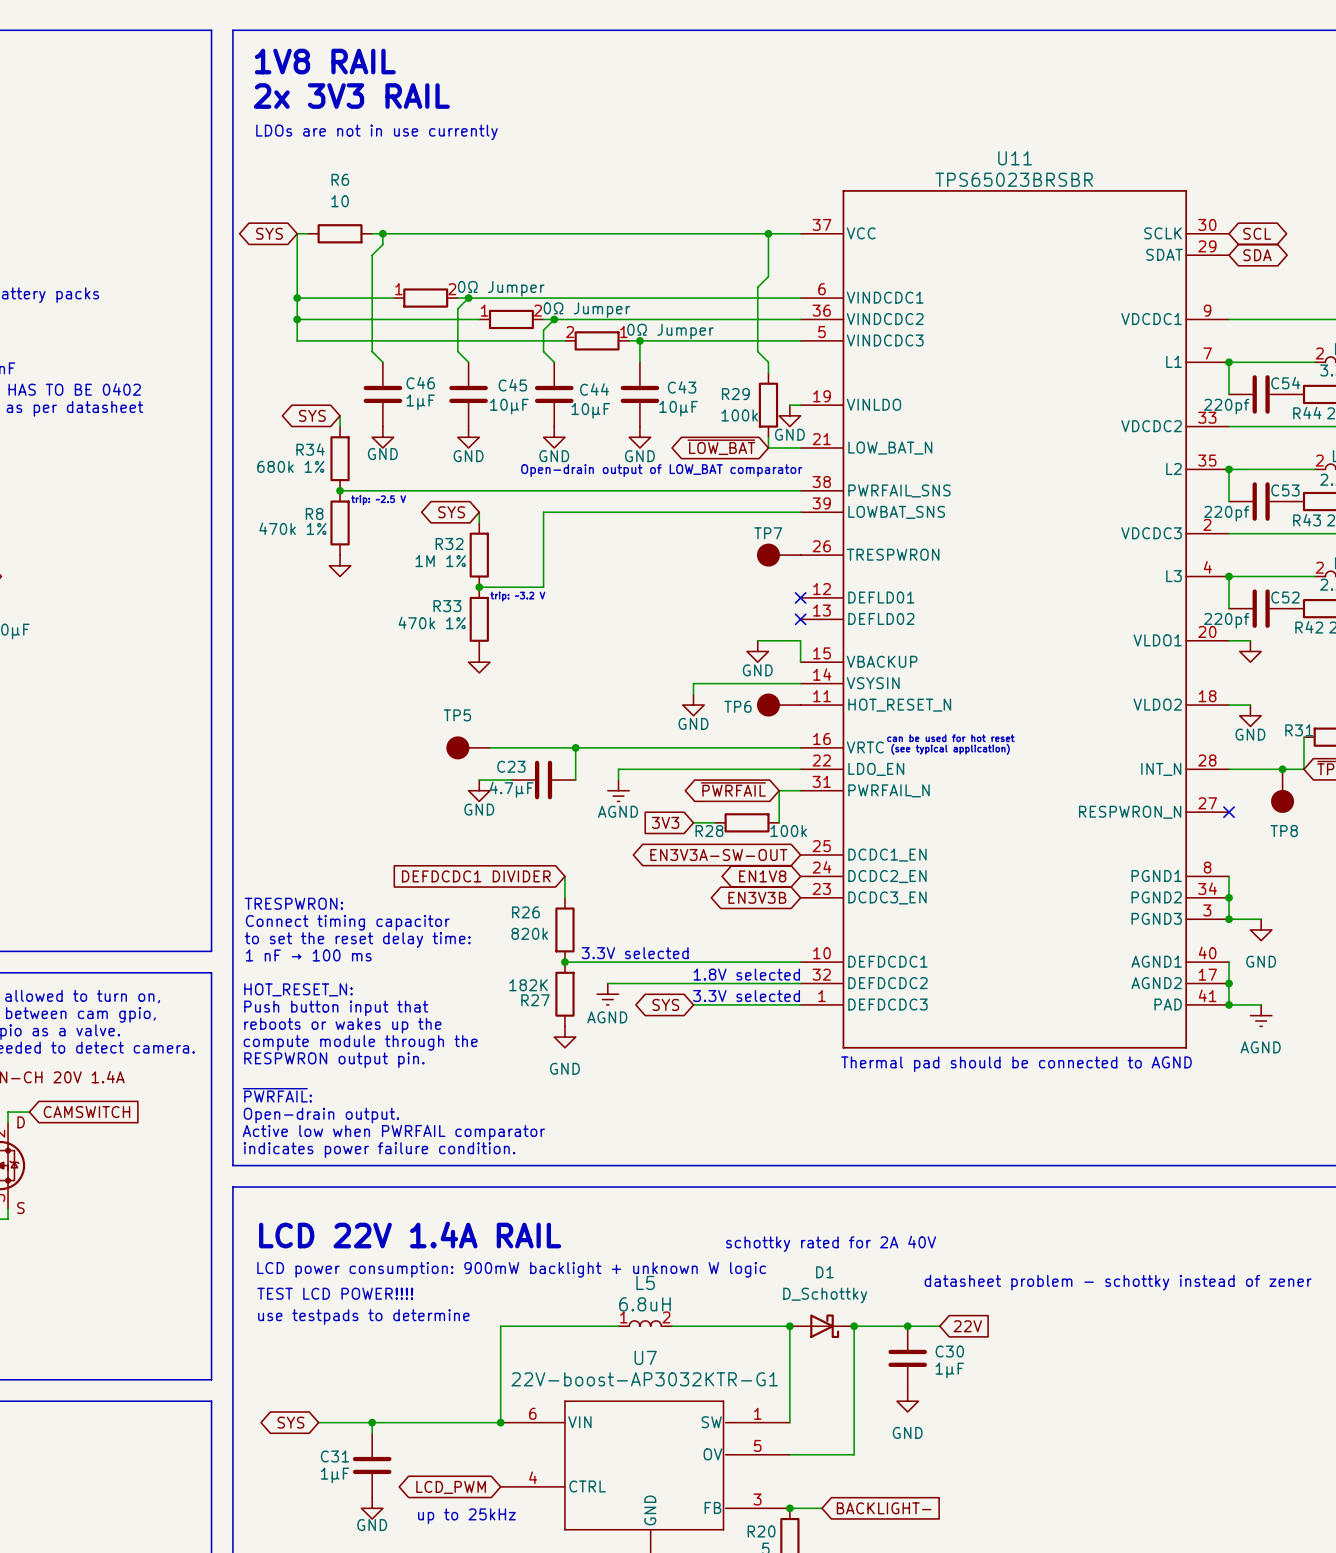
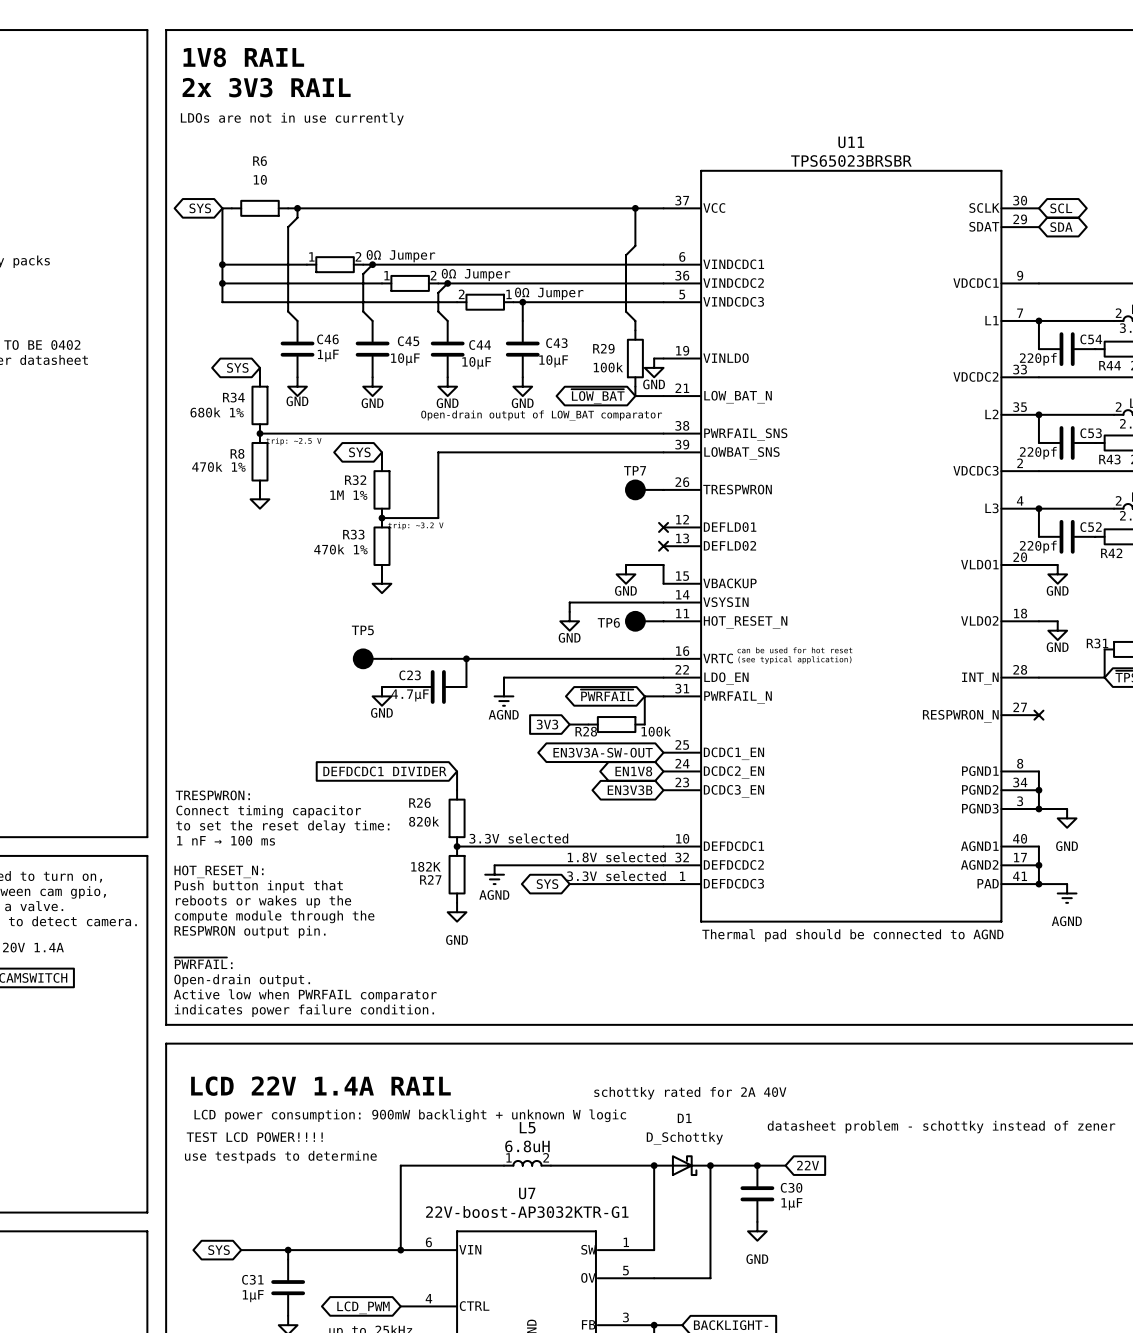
power symbol text: none -> GND (1057, 590)
junction: (1282, 769) -> none
TP8: (1282, 790) -> none

